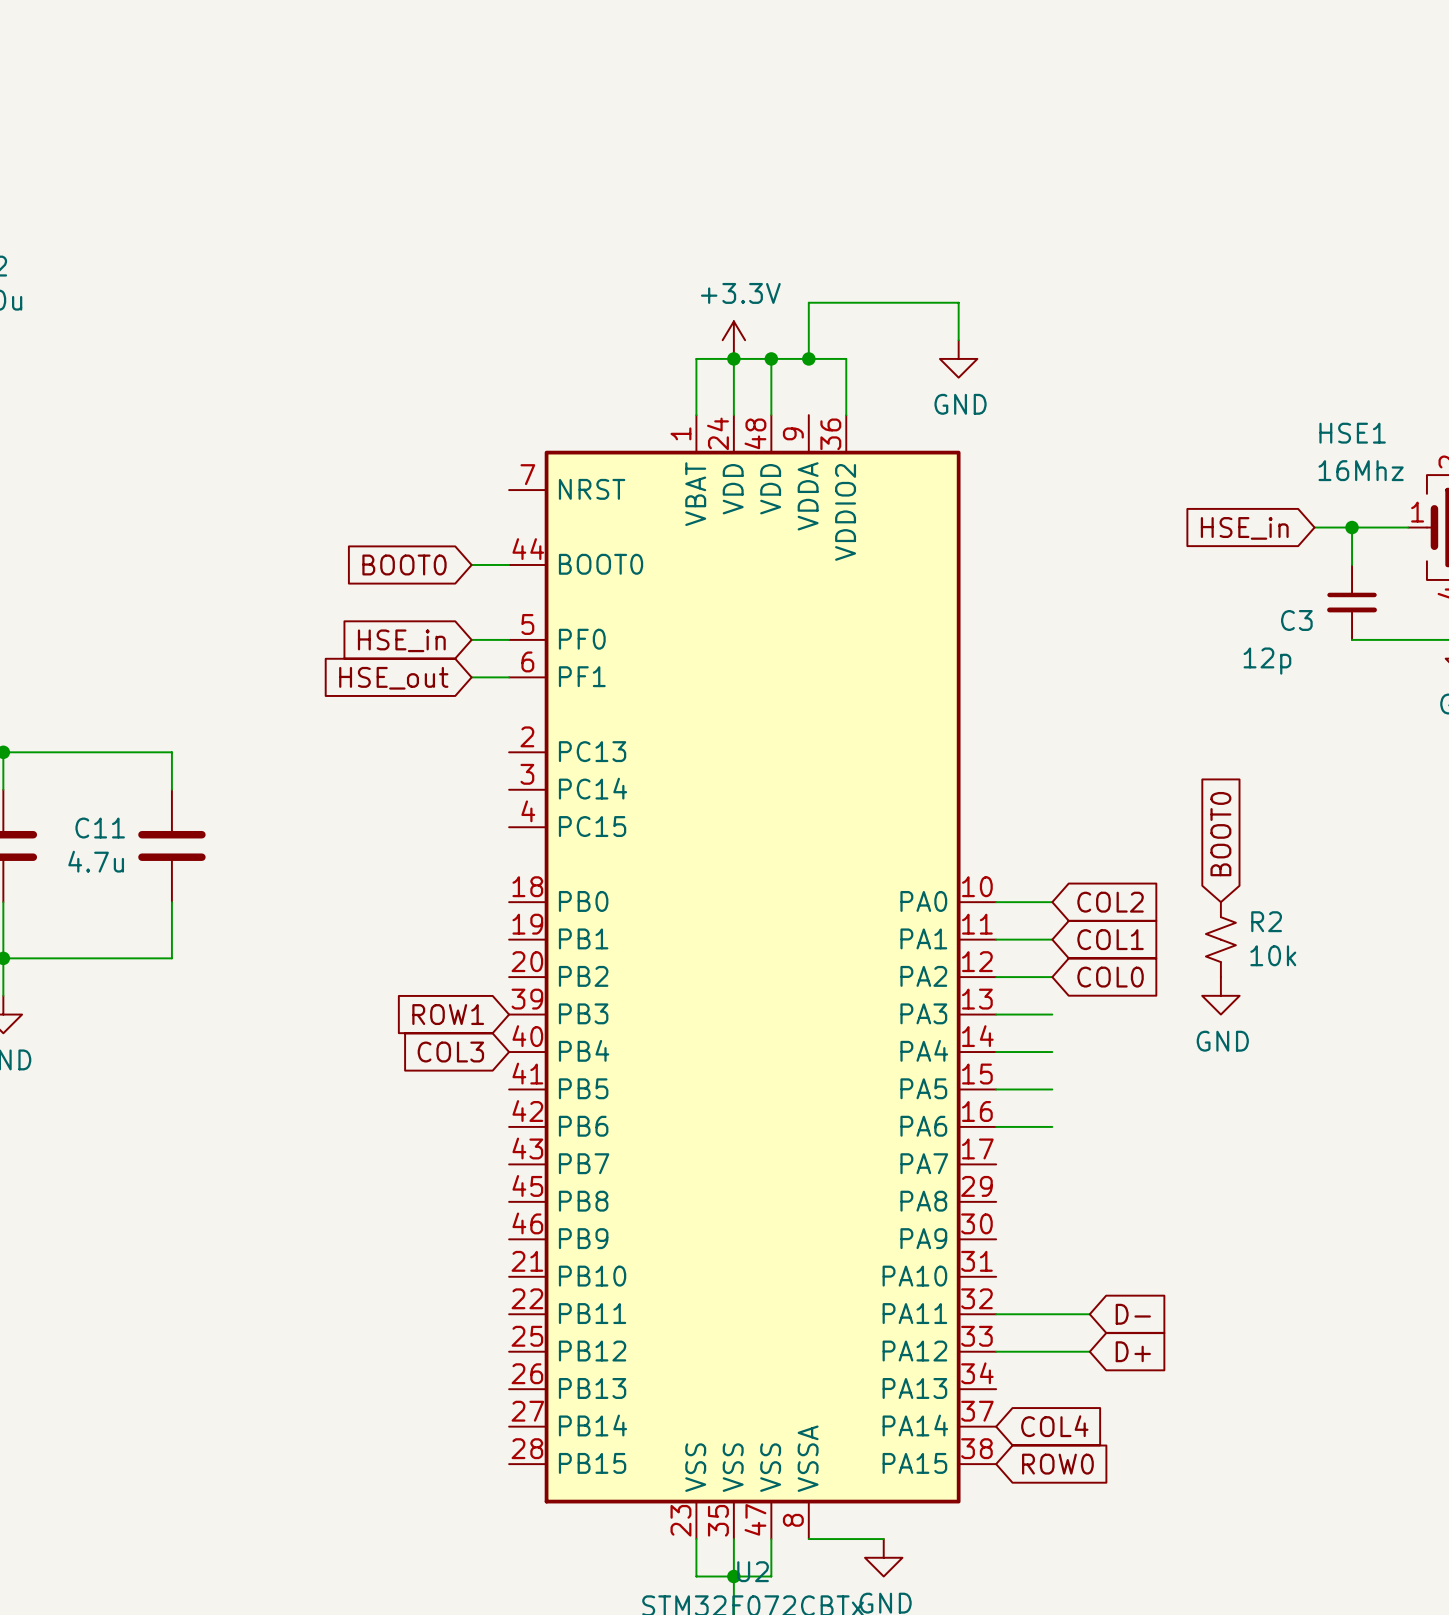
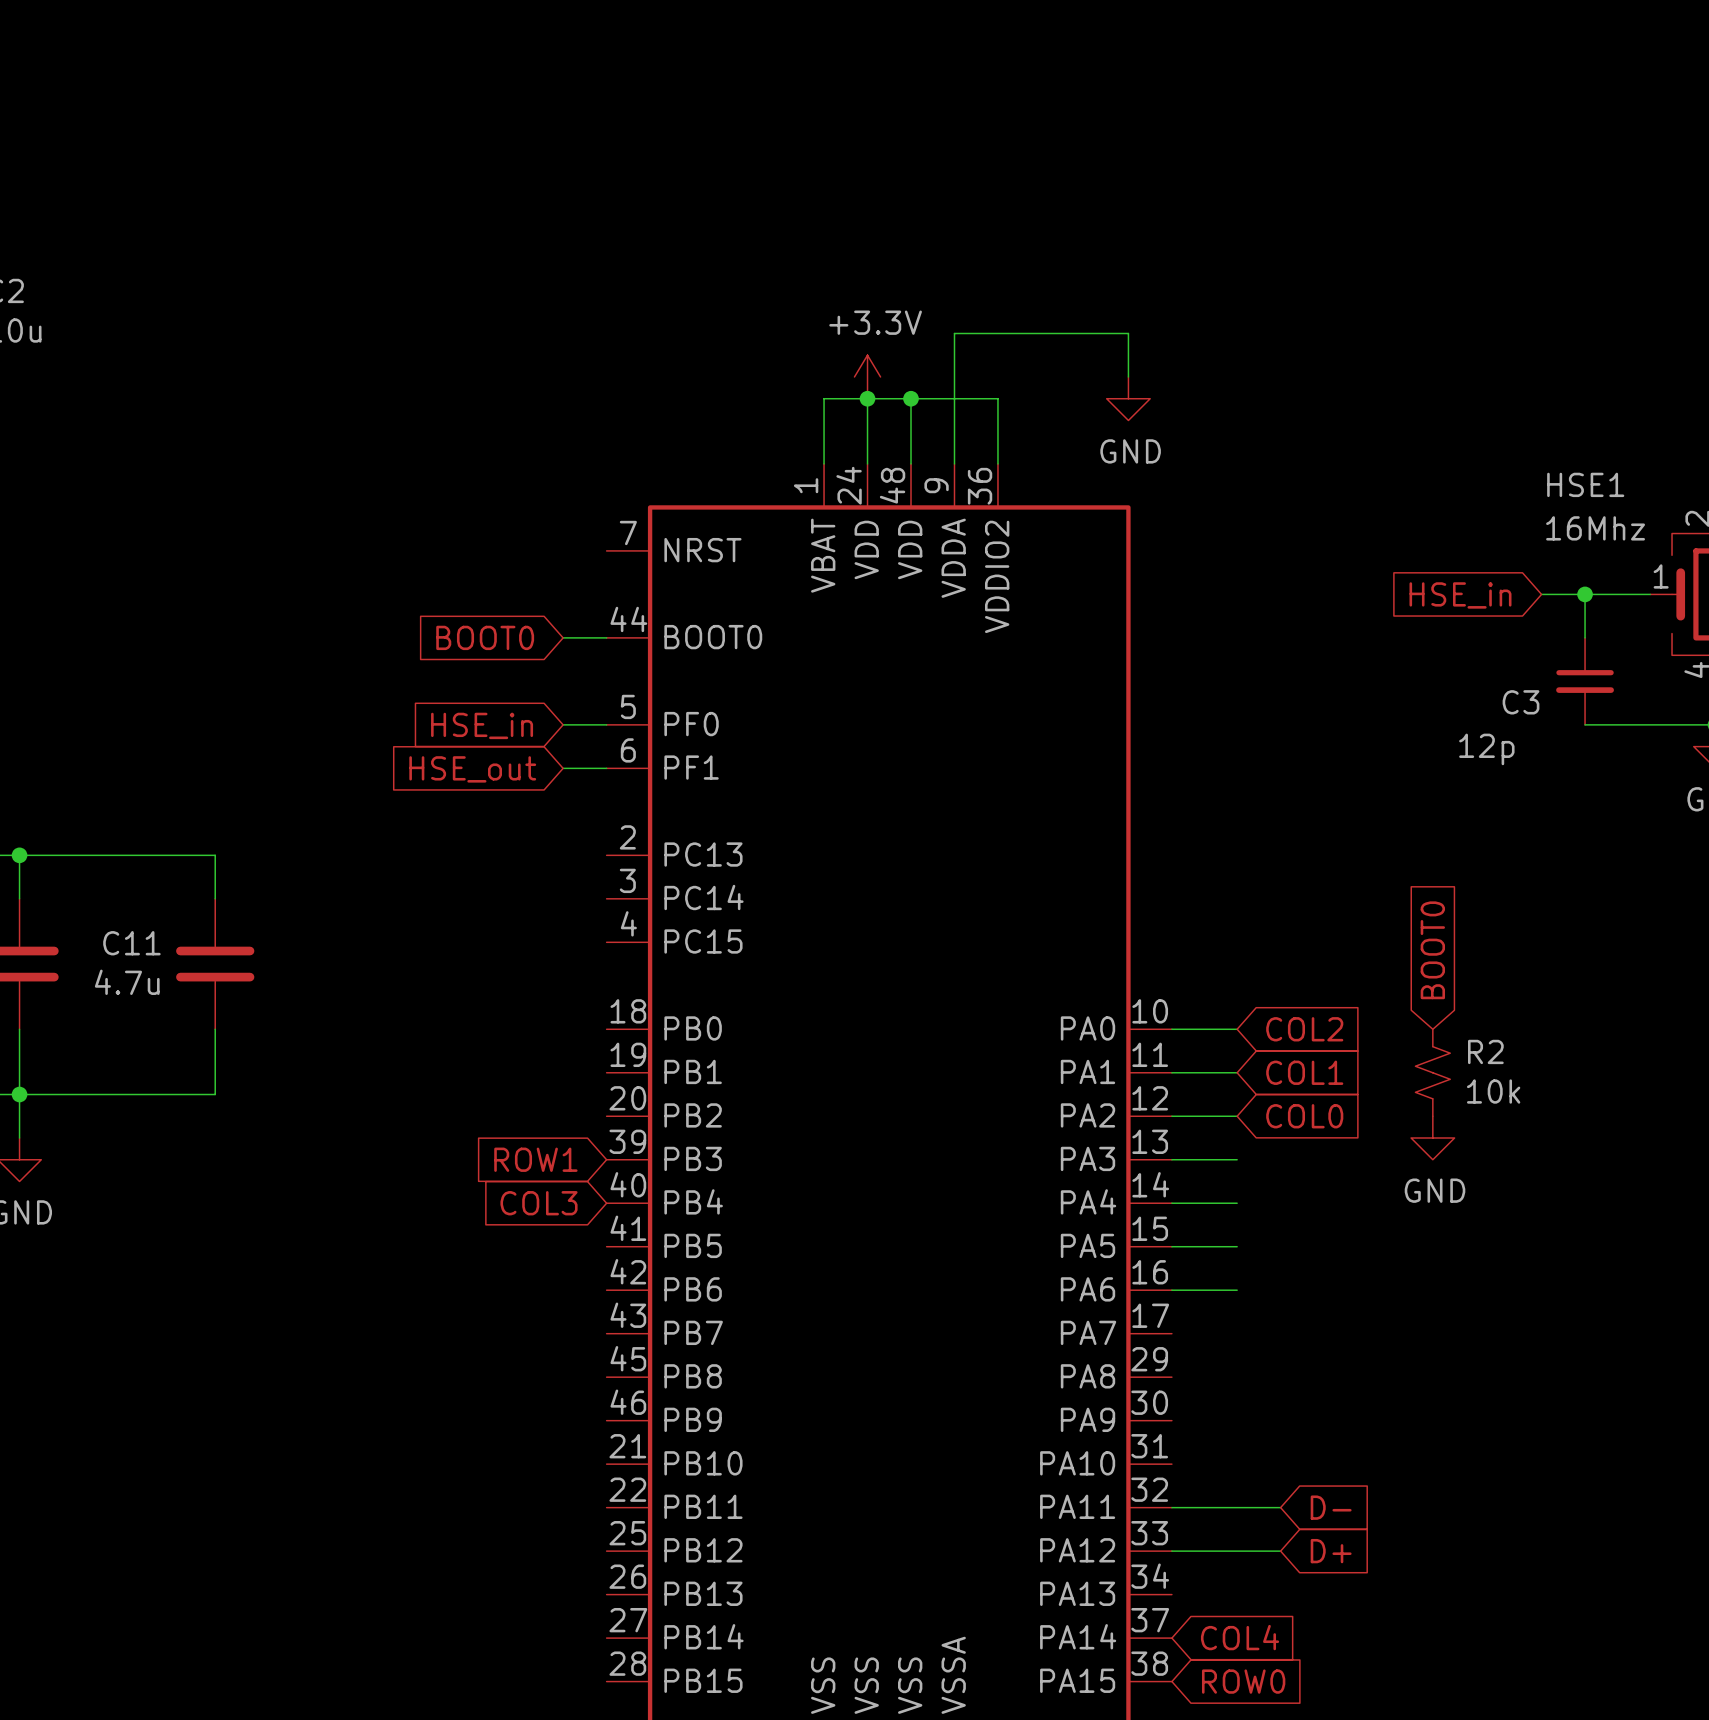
wire: none -> (954, 398) (954, 463)
junction: (808, 358) -> none

